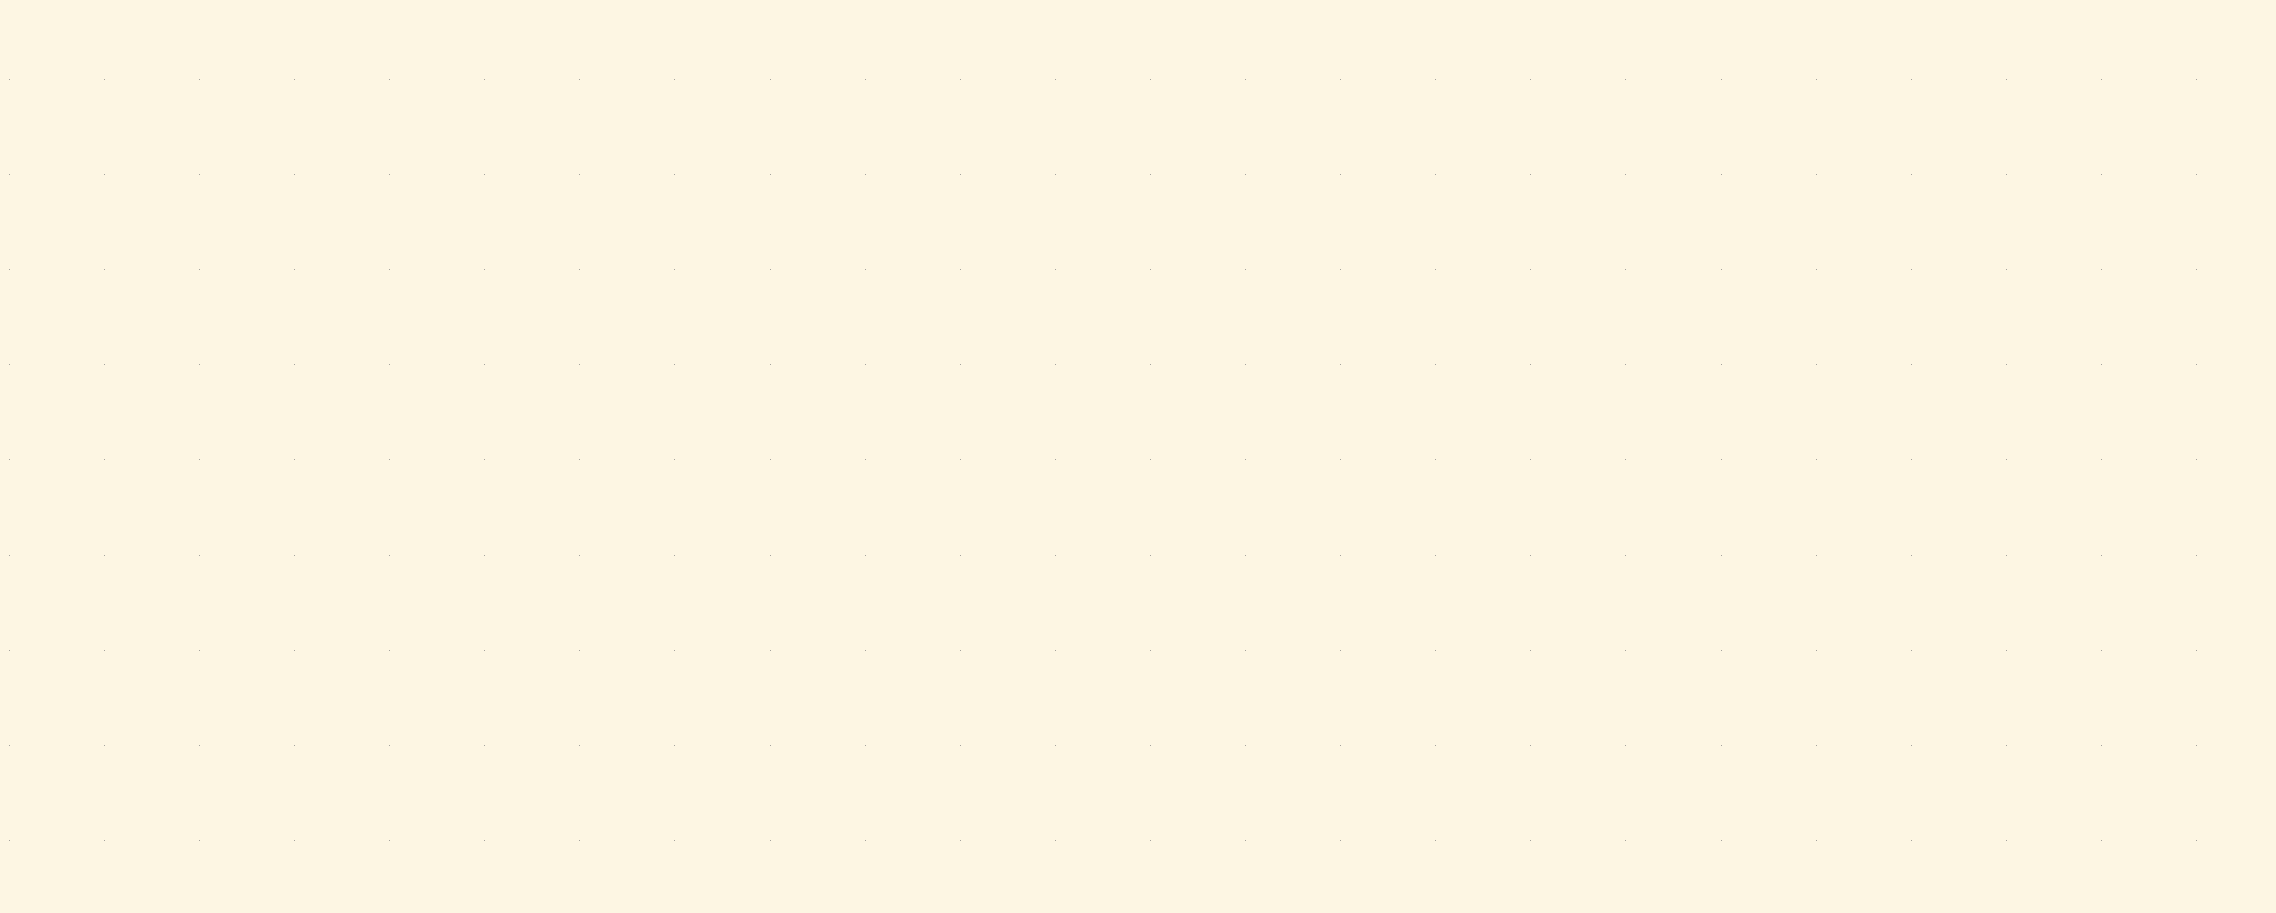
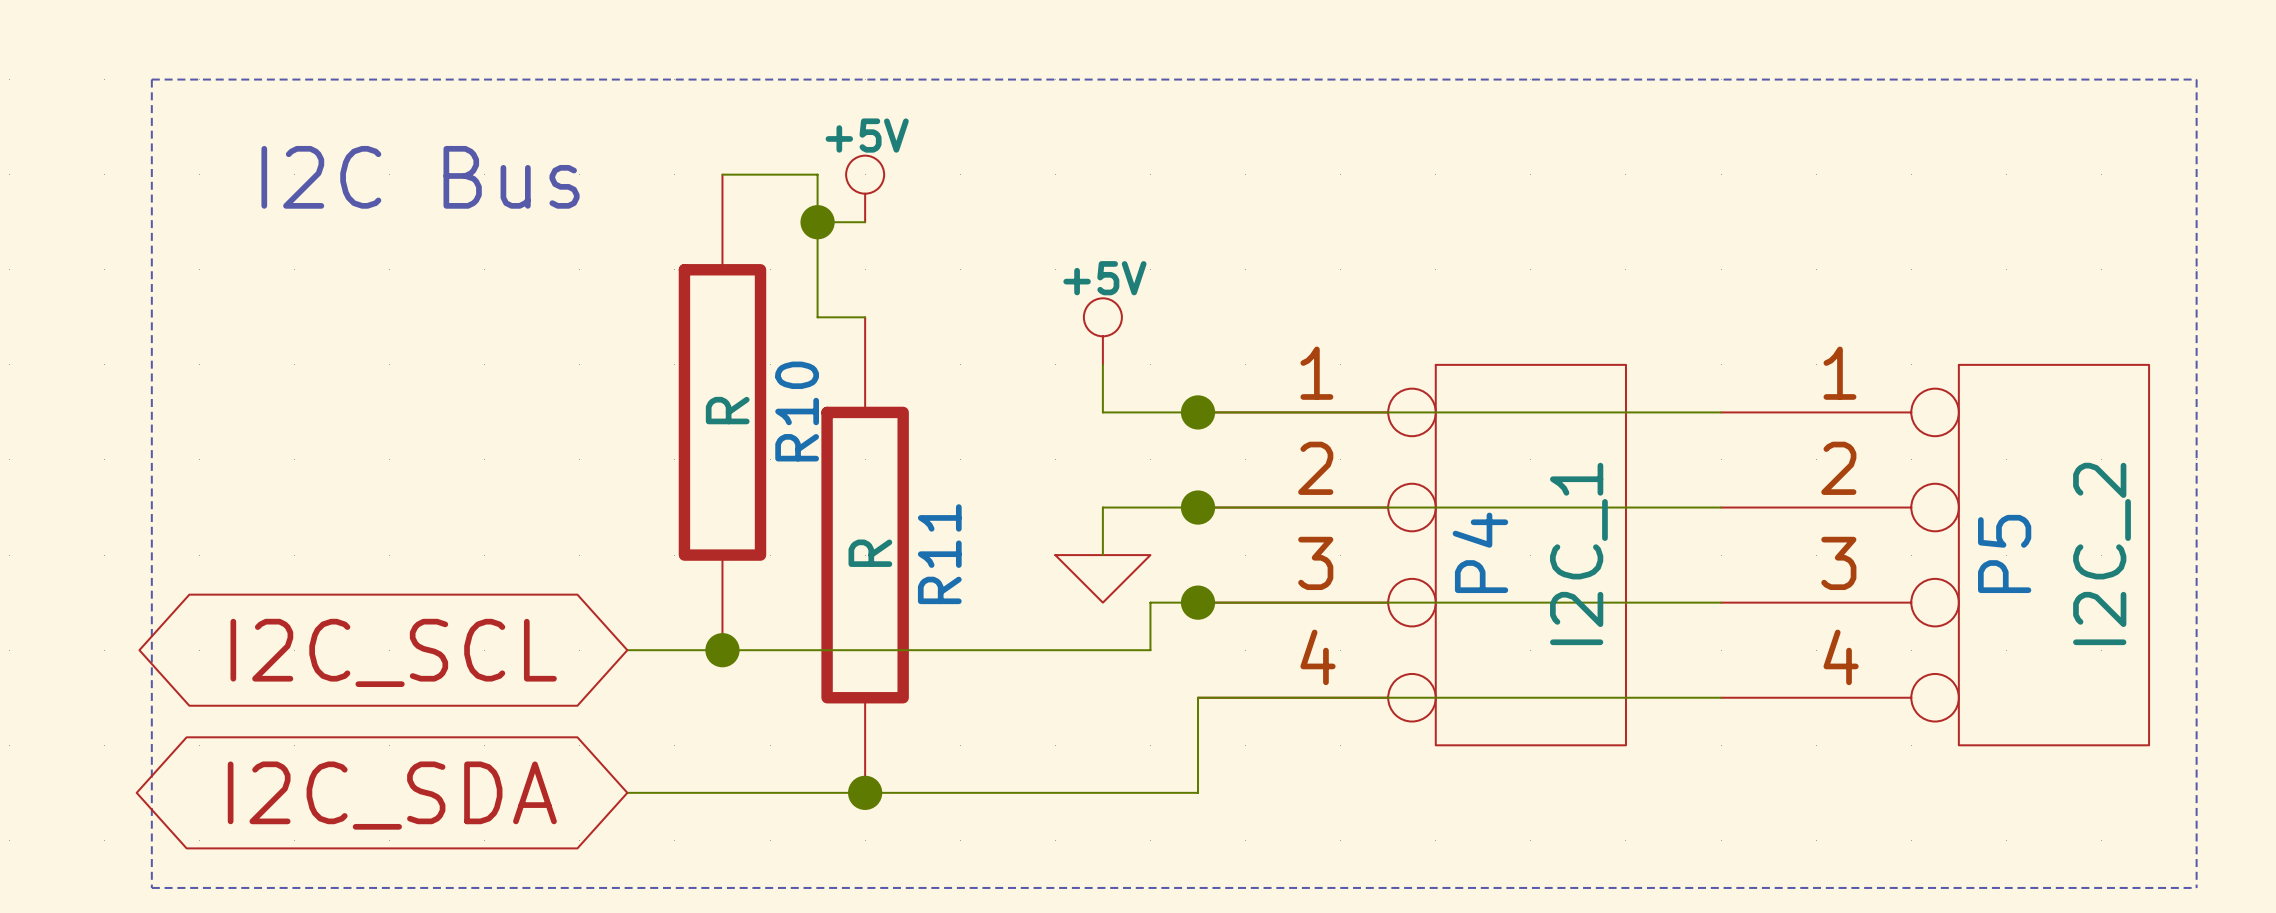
line: none -> (151, 79) (151, 887) (2196, 887) (2196, 79) (151, 79)
wire: none -> (722, 174) (817, 174) (817, 317) (865, 317)
text: none -> I2C Bus (420, 177)
power symbol: none -> +5V (865, 188)
wire: none -> (817, 222) (865, 222)
junction: none -> (817, 222)
power symbol: none -> +5V (1102, 331)
wire: none -> (1102, 364) (1102, 412) (1721, 412)
R10: none -> R (722, 412)
junction: none -> (1198, 412)
junction: none -> (1198, 507)
wire: none -> (1721, 507) (1102, 507) (1102, 555)
R11: none -> R (865, 555)
P4: none -> I2C_1 (1411, 555)
P5: none -> I2C_2 (1935, 555)
power symbol: none -> (1102, 578)
junction: none -> (1198, 602)
wire: none -> (1721, 602) (1150, 602) (1150, 650) (627, 650)
junction: none -> (722, 650)
global label: none -> I2C_SCL (393, 652)
wire: none -> (1721, 697) (1198, 697) (1198, 792) (627, 792)
junction: none -> (865, 792)
global label: none -> I2C_SDA (392, 795)

